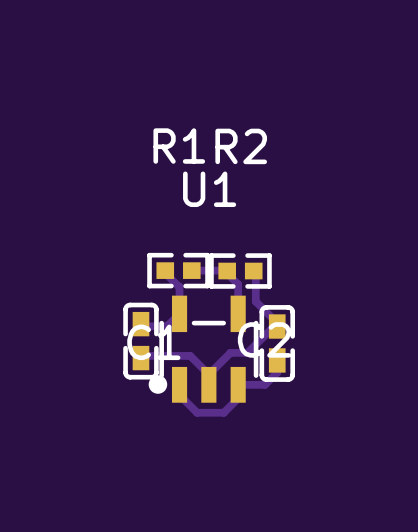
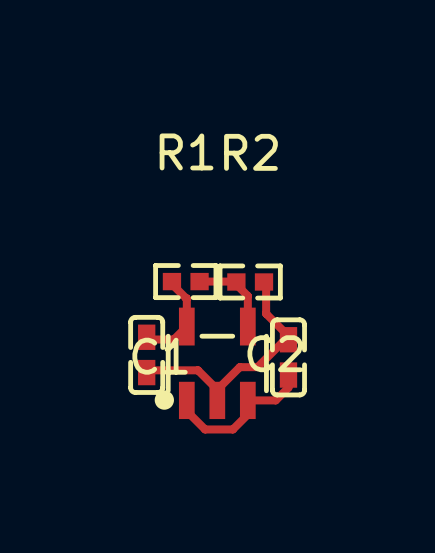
U1 name: U1 (209, 189) -> none

